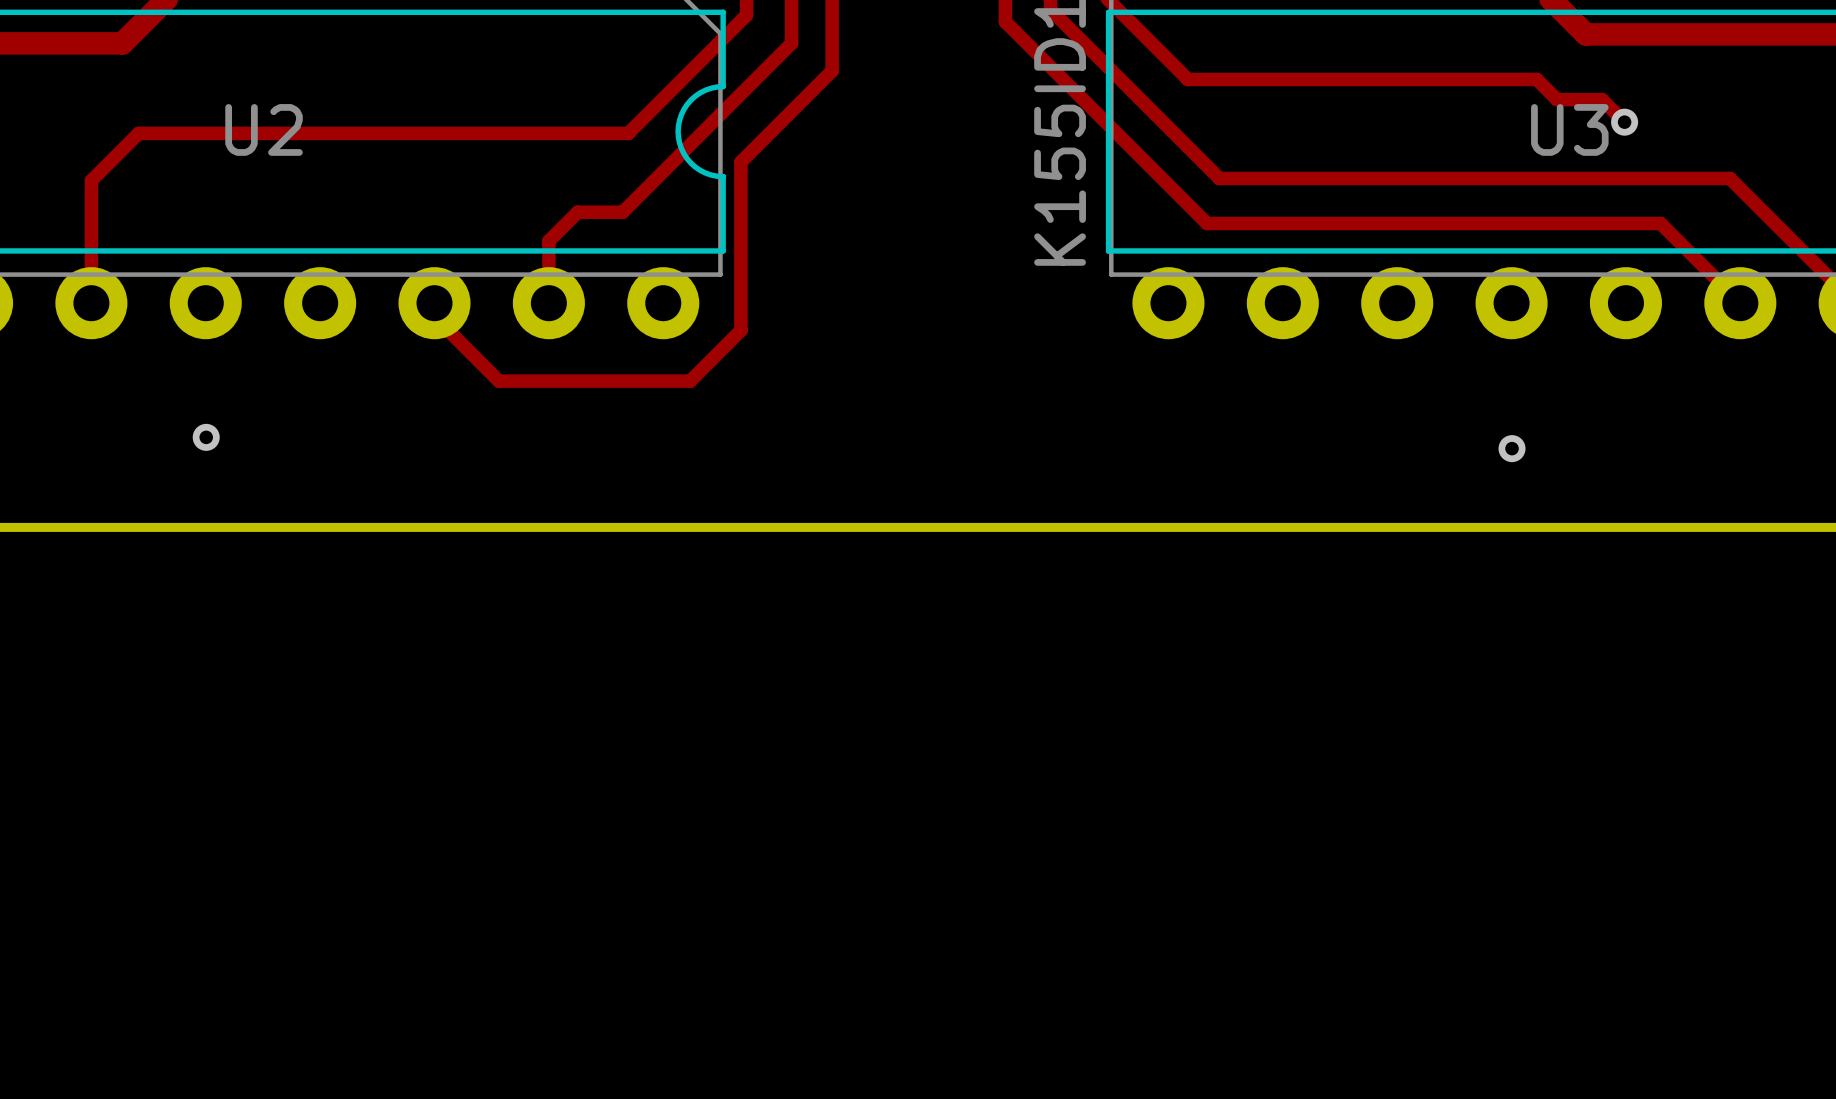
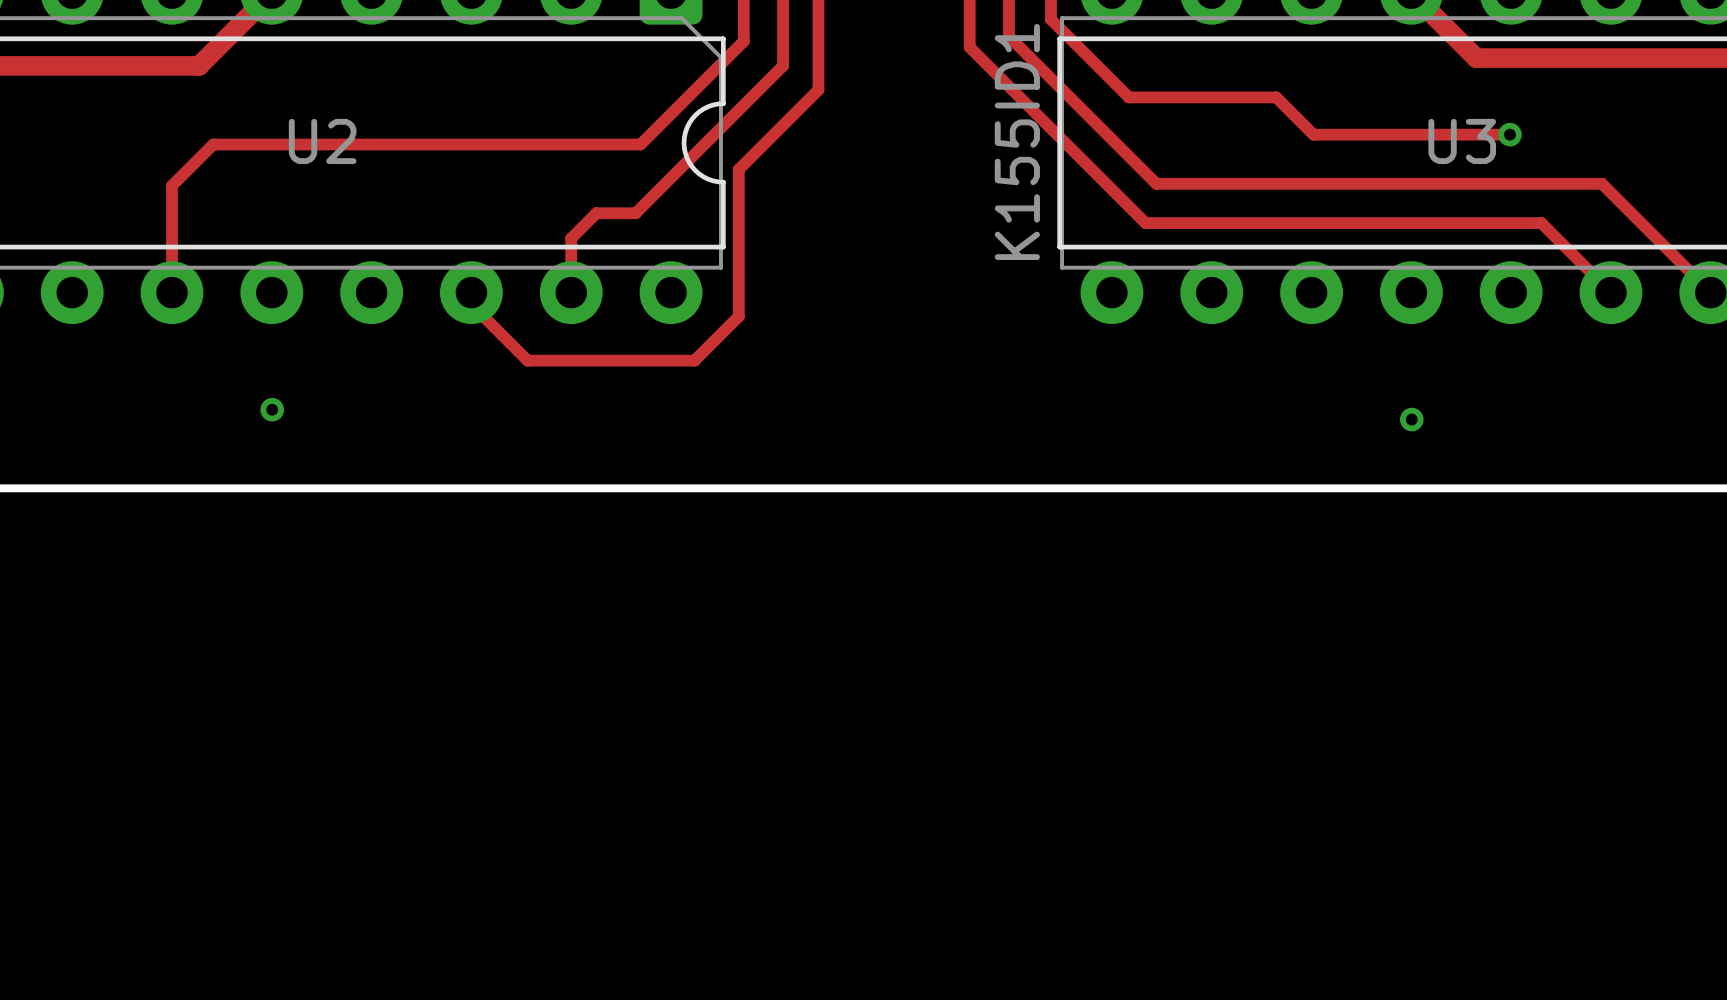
track: (1356, 79) (1536, 79) (1557, 99) (1602, 99) (1624, 122) -> (1276, 97) (1313, 134) (1510, 134)

